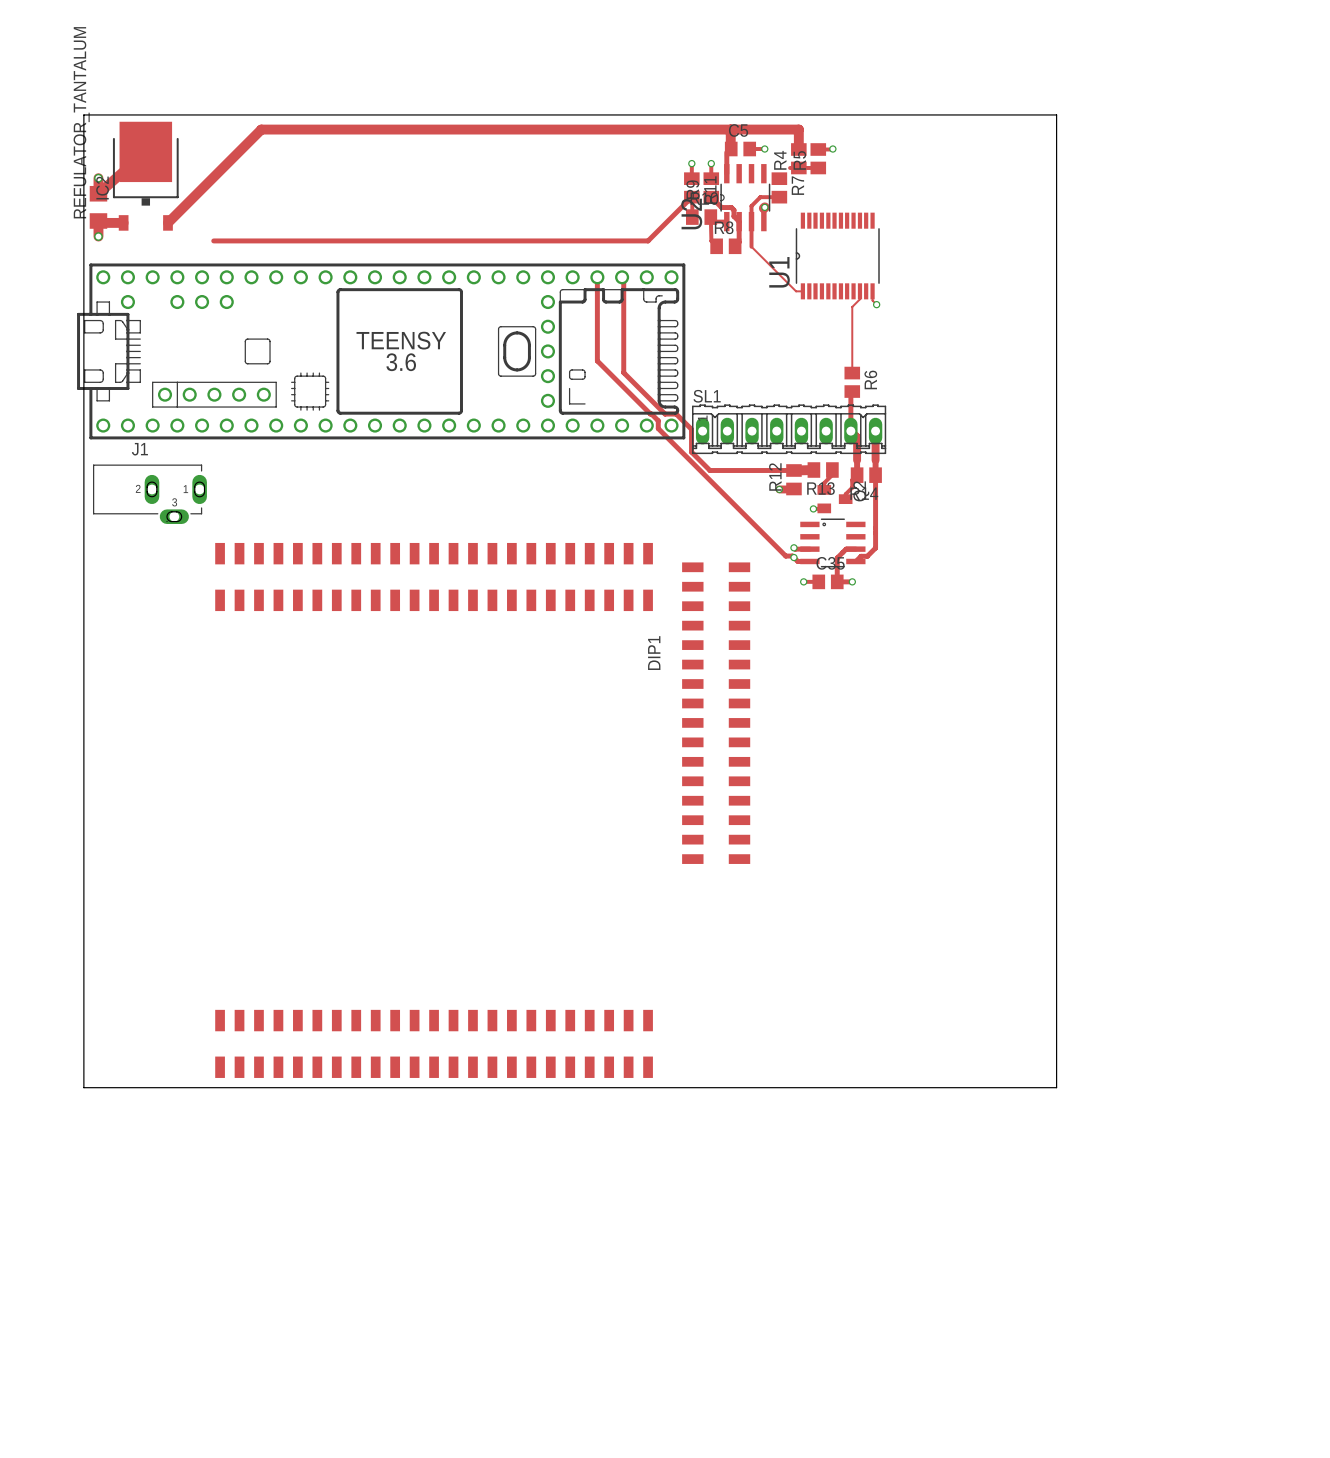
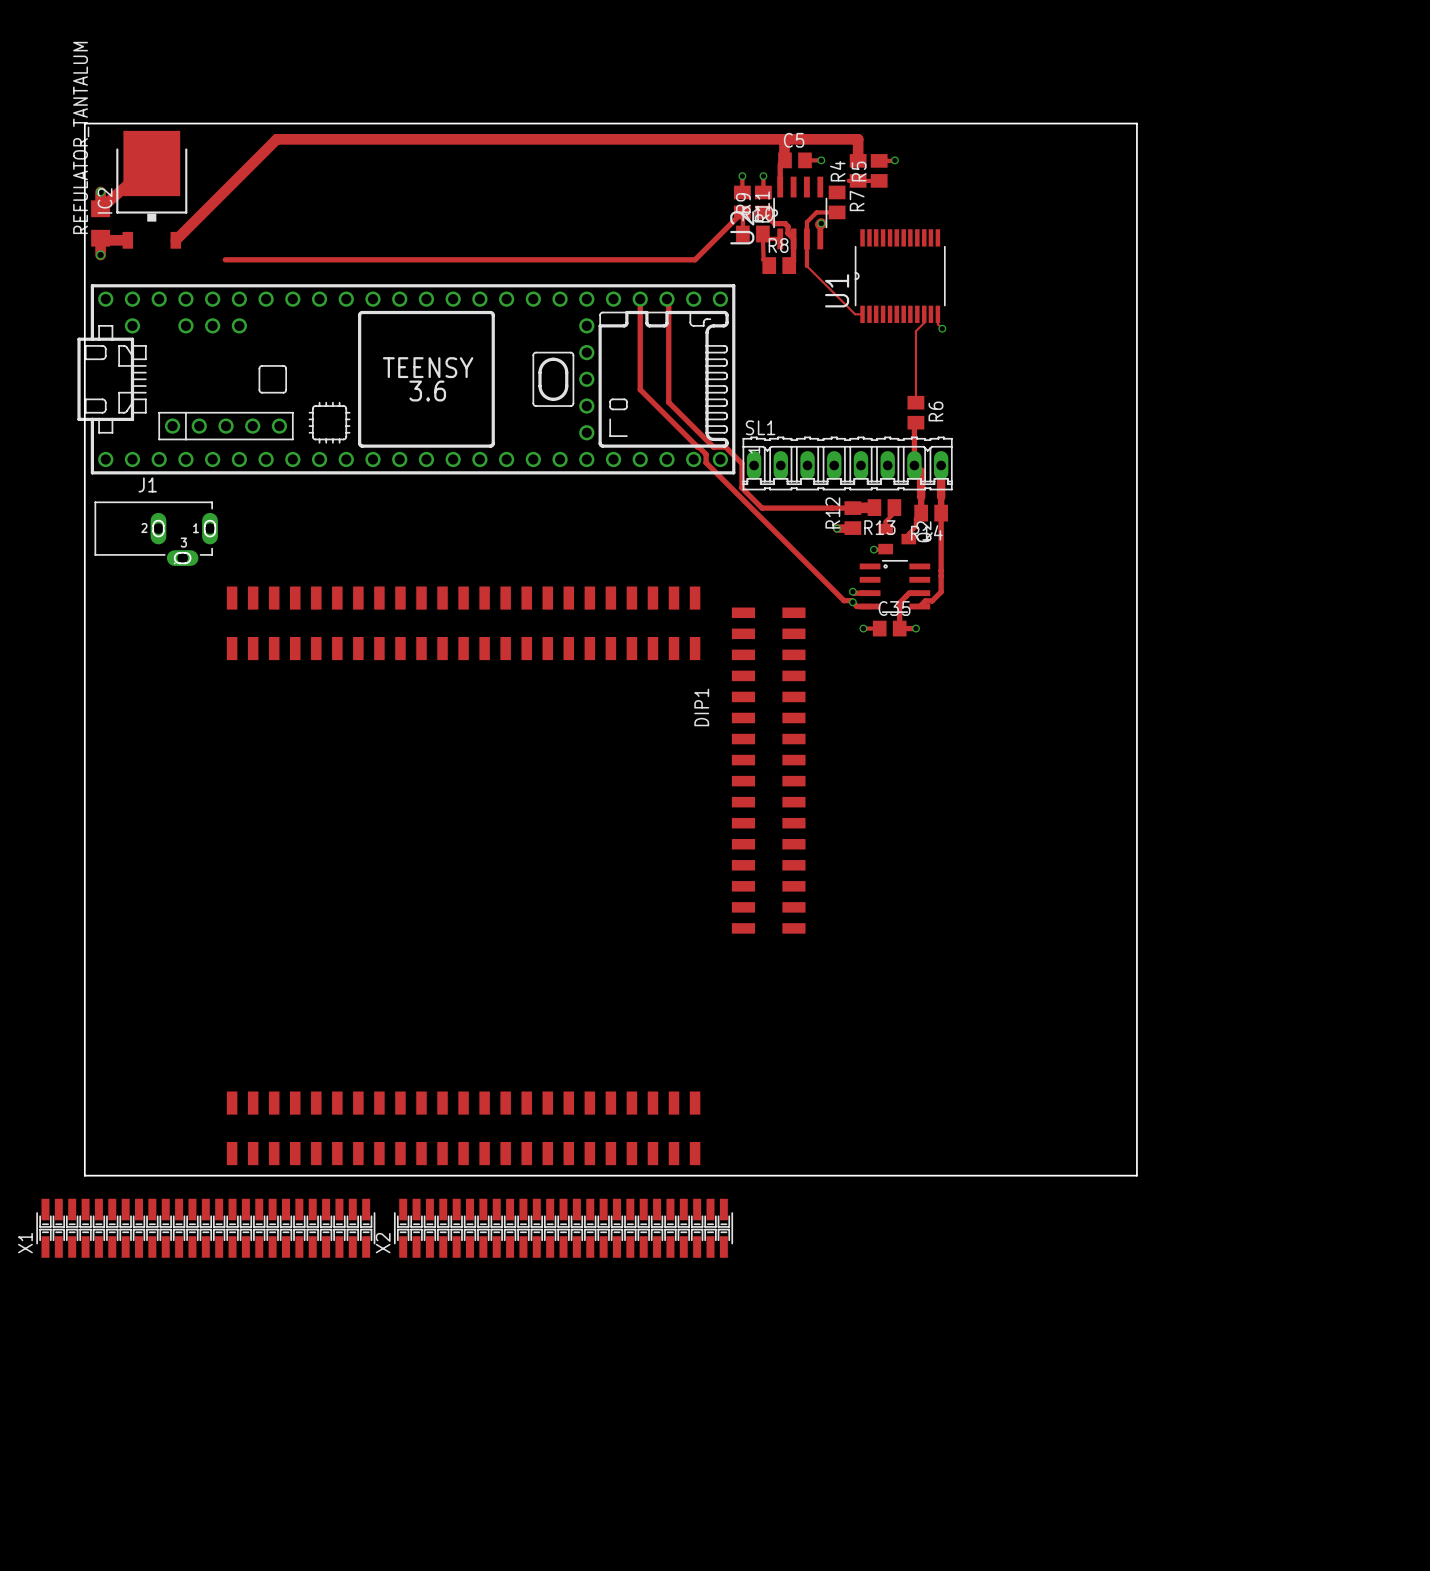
X1: none -> (205, 1228)
X2: none -> (563, 1228)

